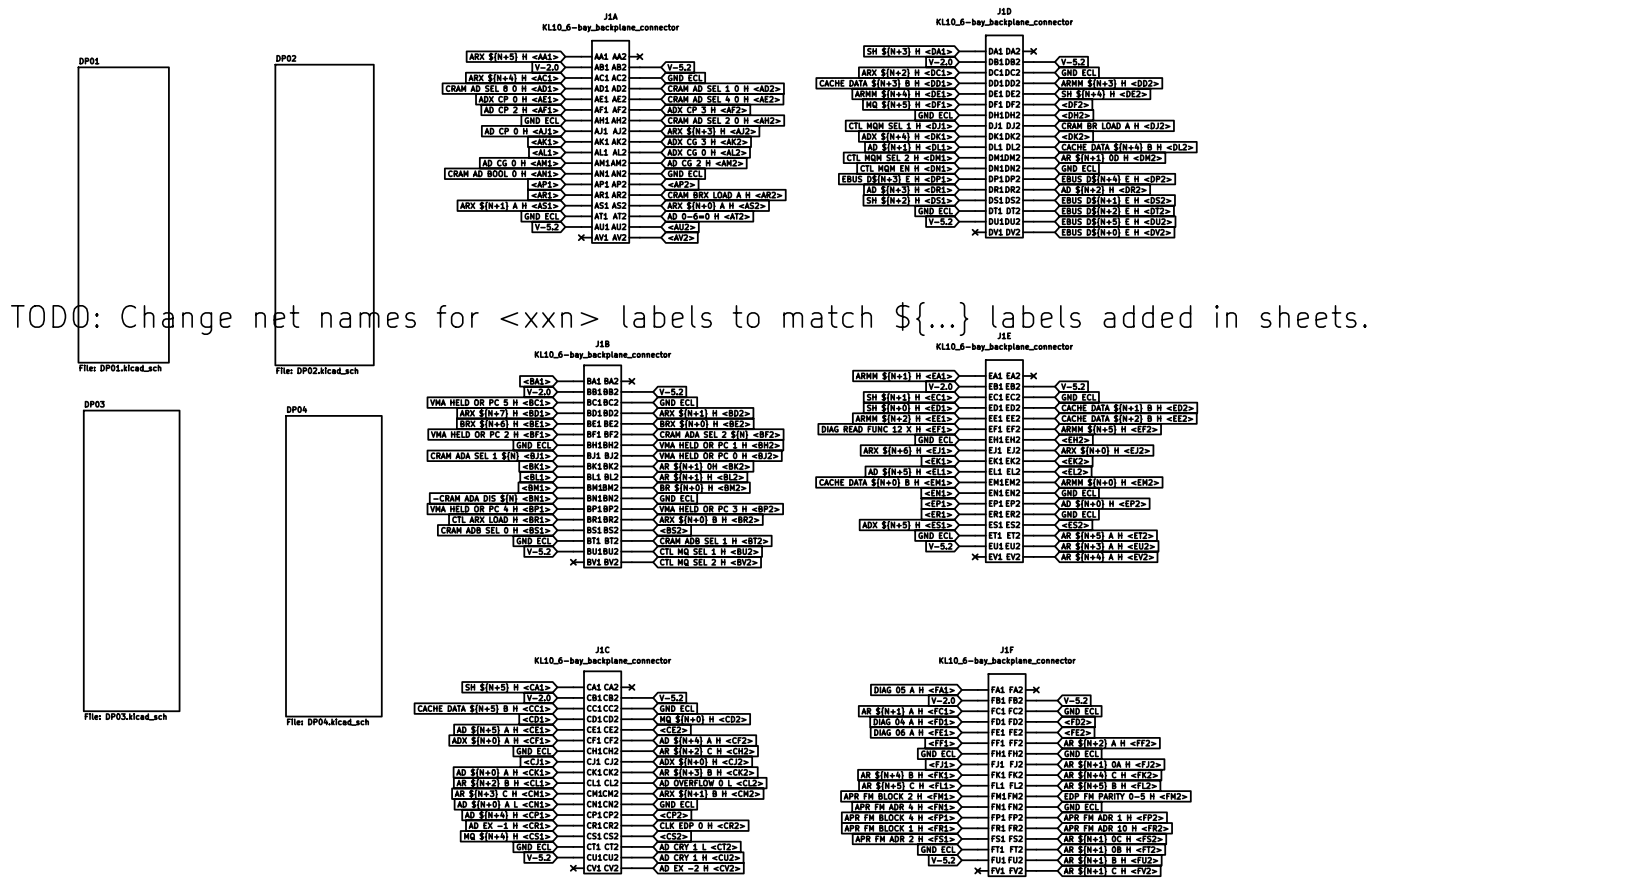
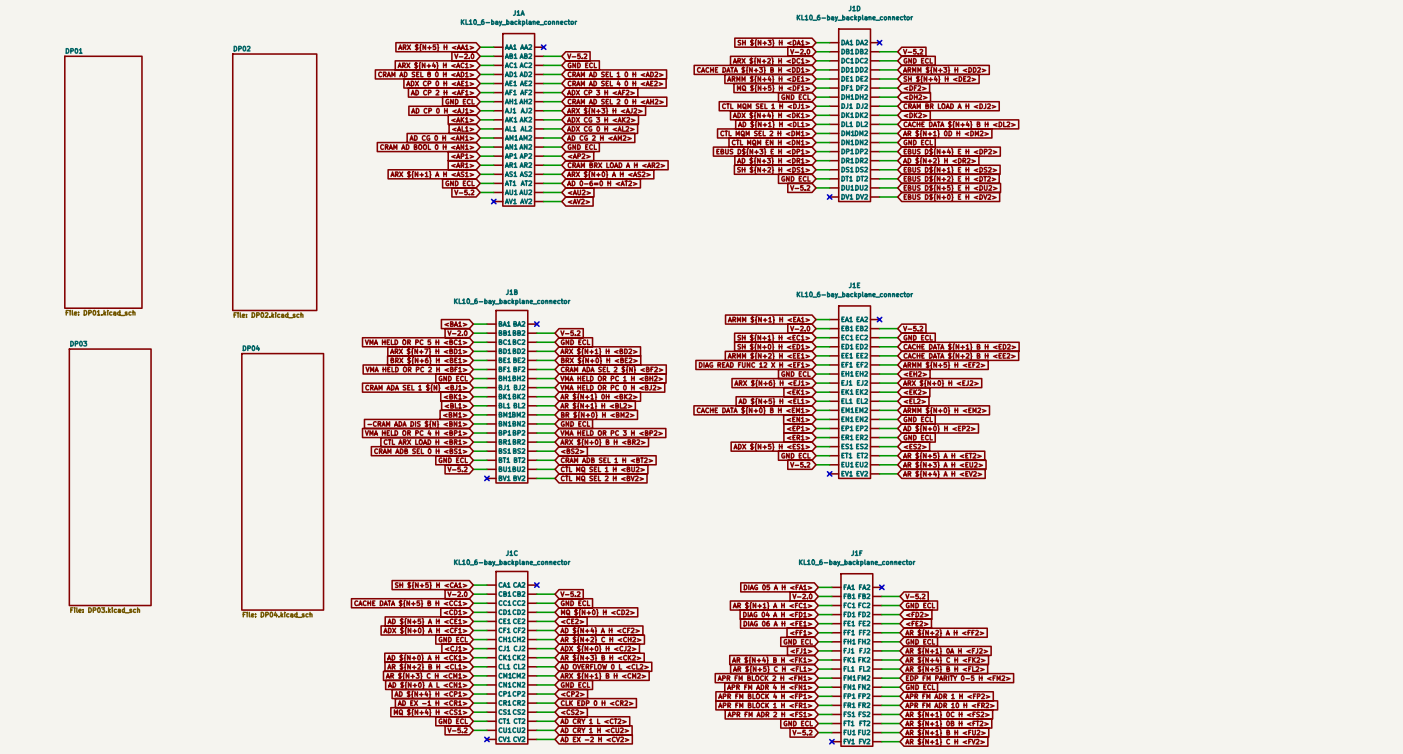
text: TODO: Change net names for <xxn> labels to match ${...} labels added in sheets. (688, 318) -> none

